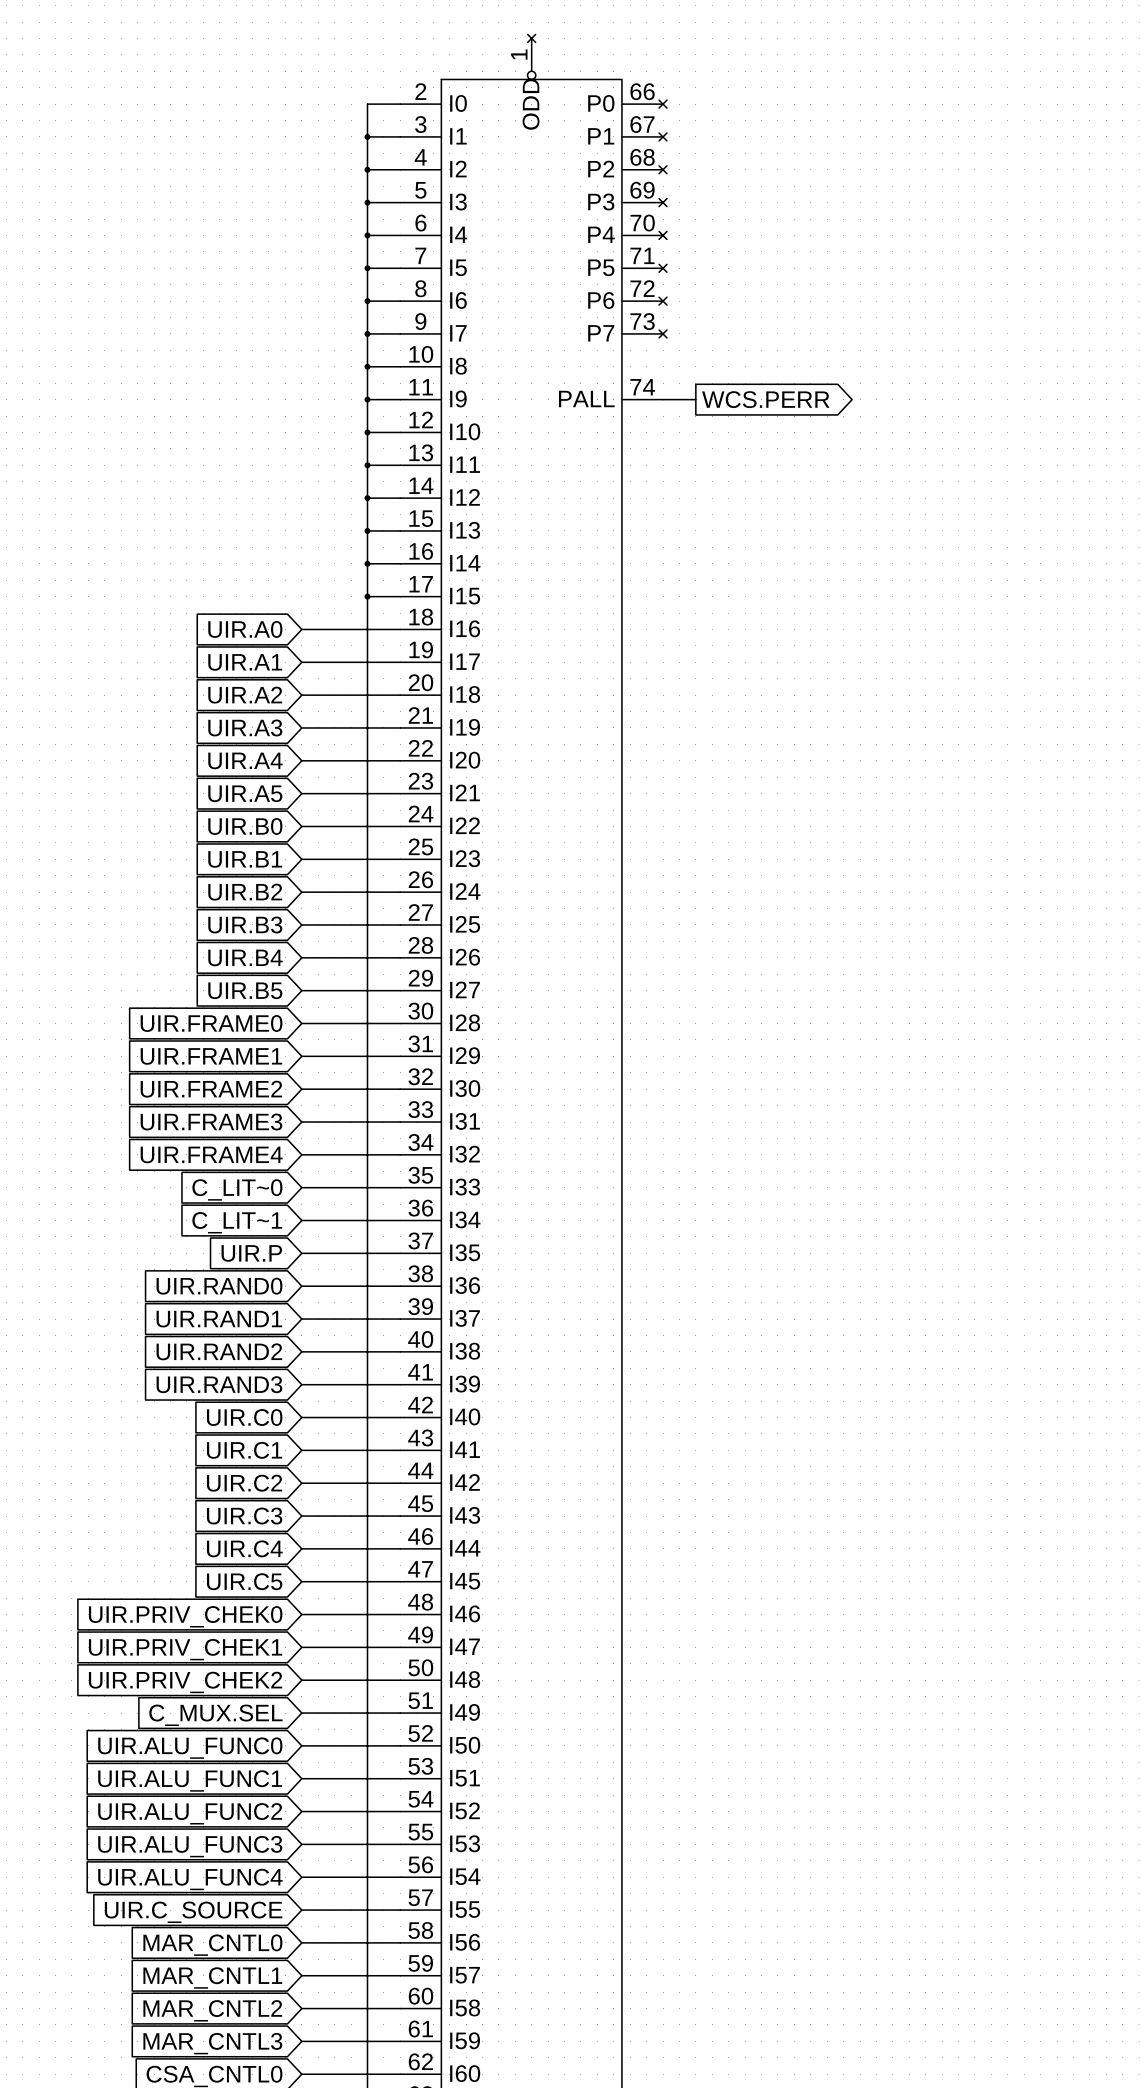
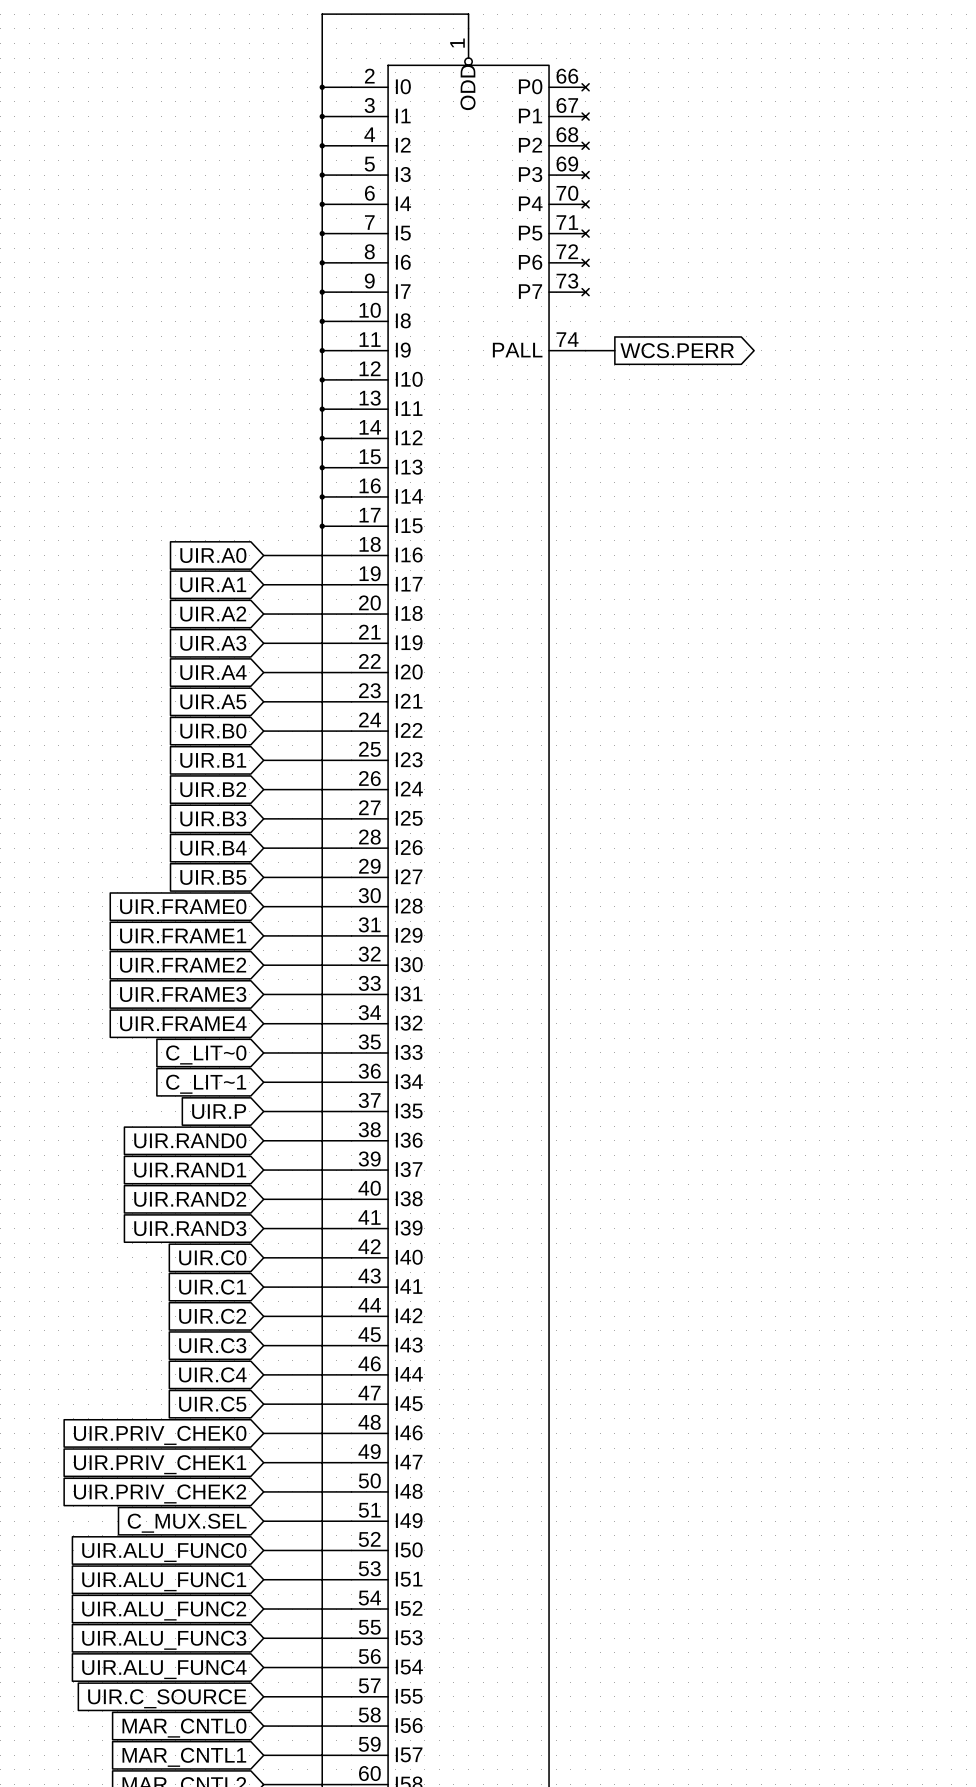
wire: none -> (468, 28) (468, 14) (322, 14) (322, 87)
no-connect mark: (531, 38) -> none
junction: none -> (322, 87)

